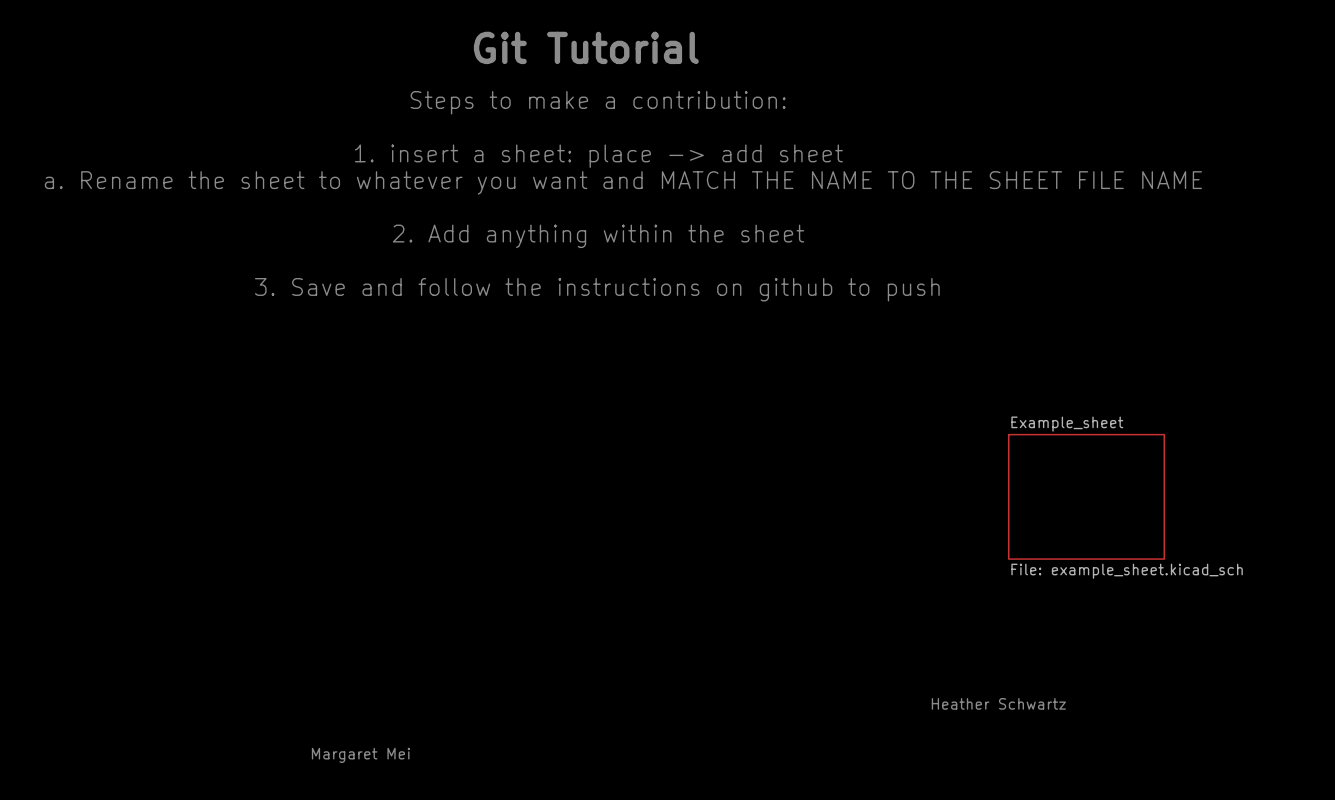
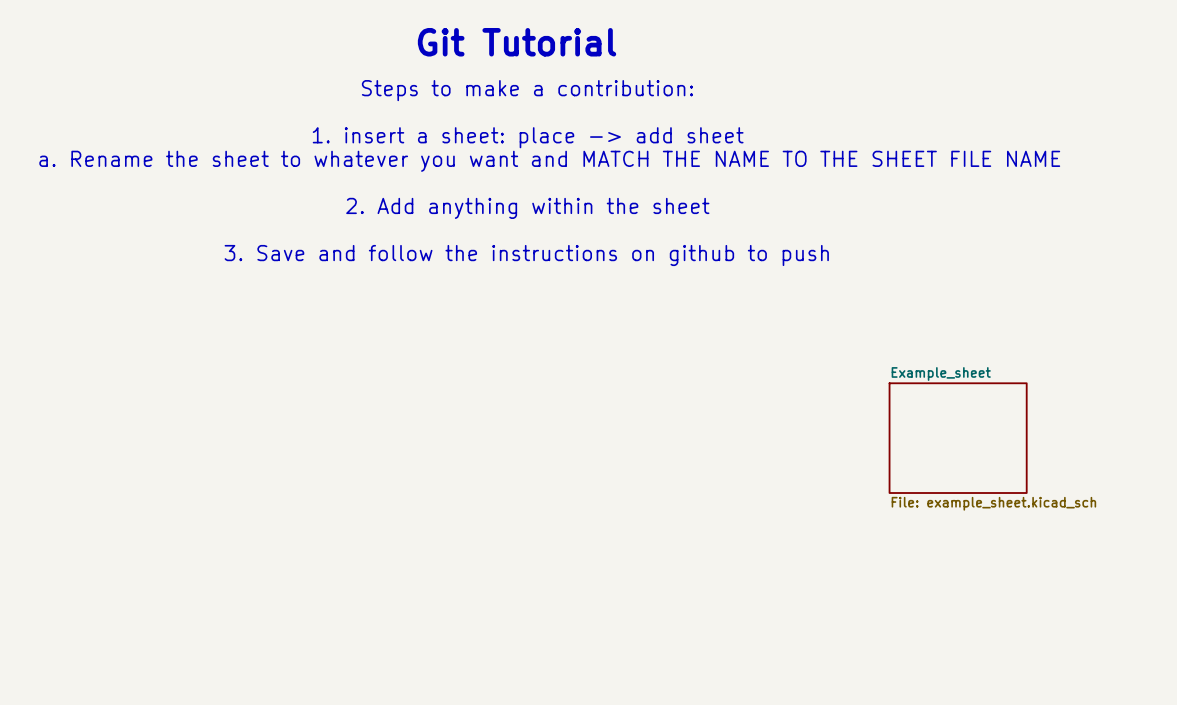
text: Heather Schwartz (998, 703) -> none
text: Margaret Mei (360, 755) -> none

